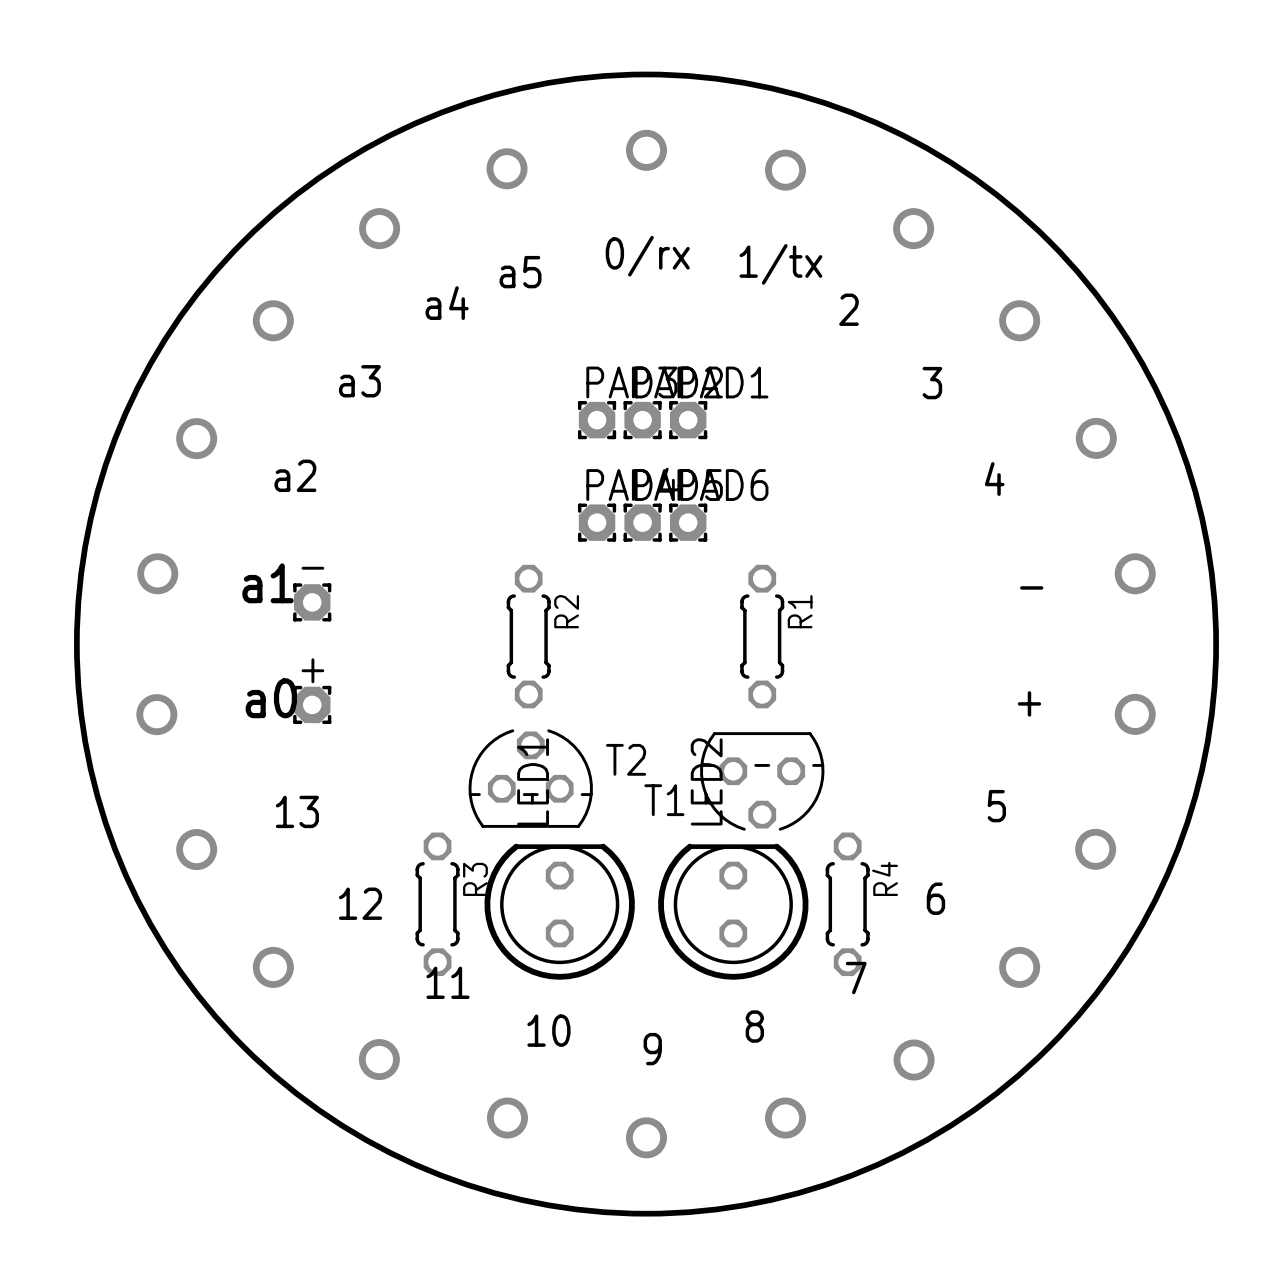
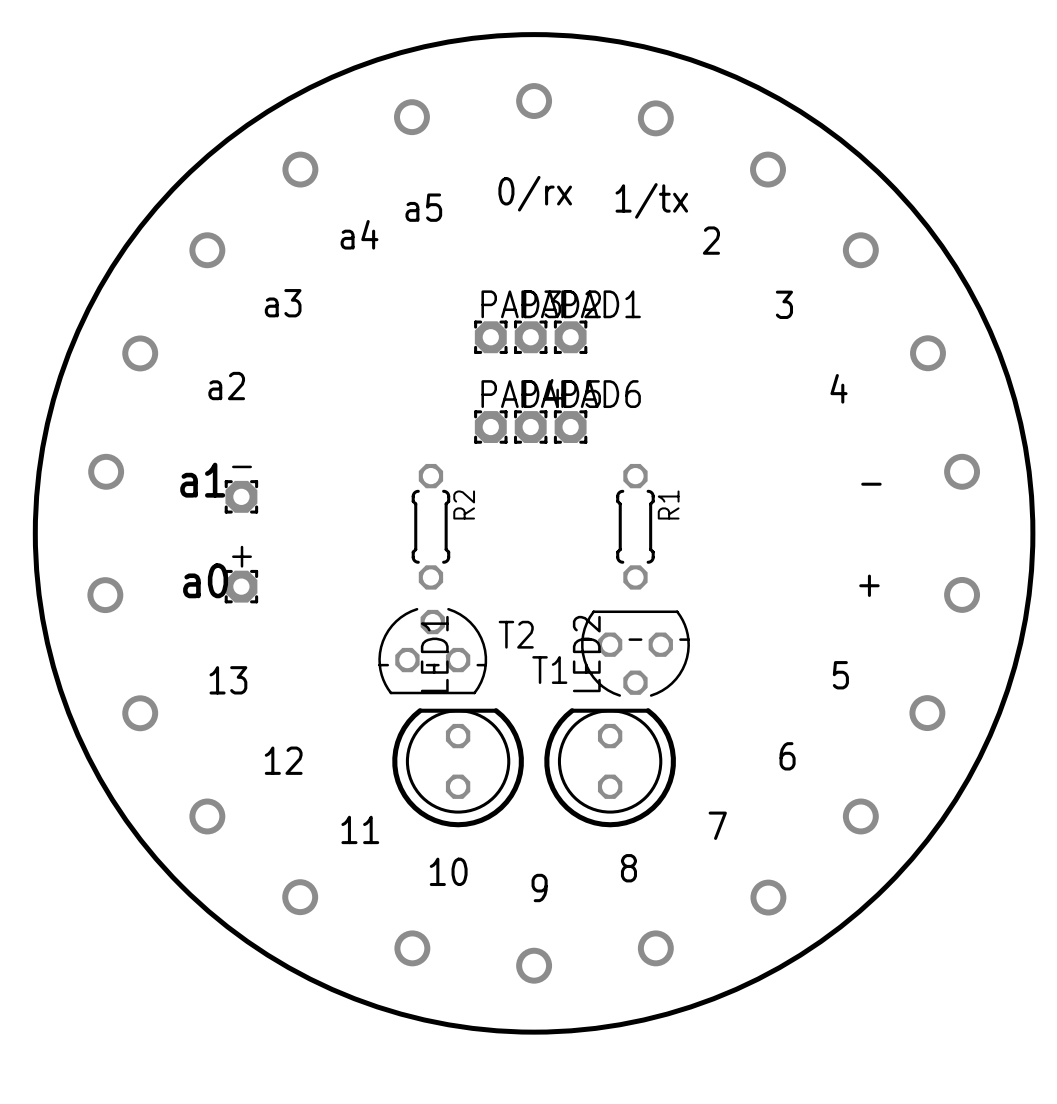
R3: (437, 904) -> none
R4: (847, 904) -> none

